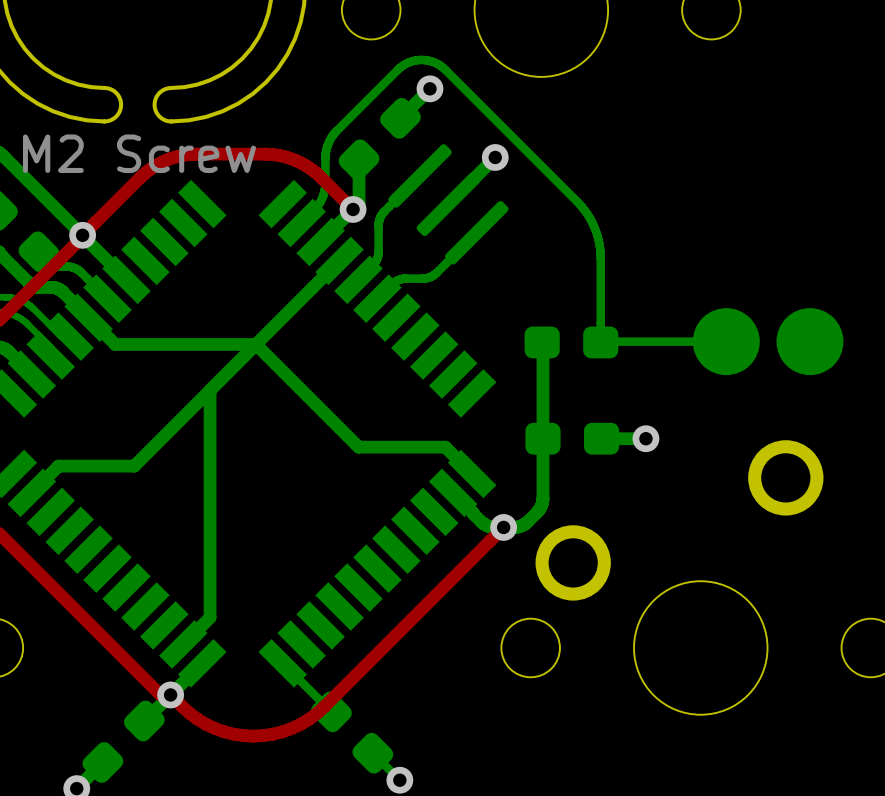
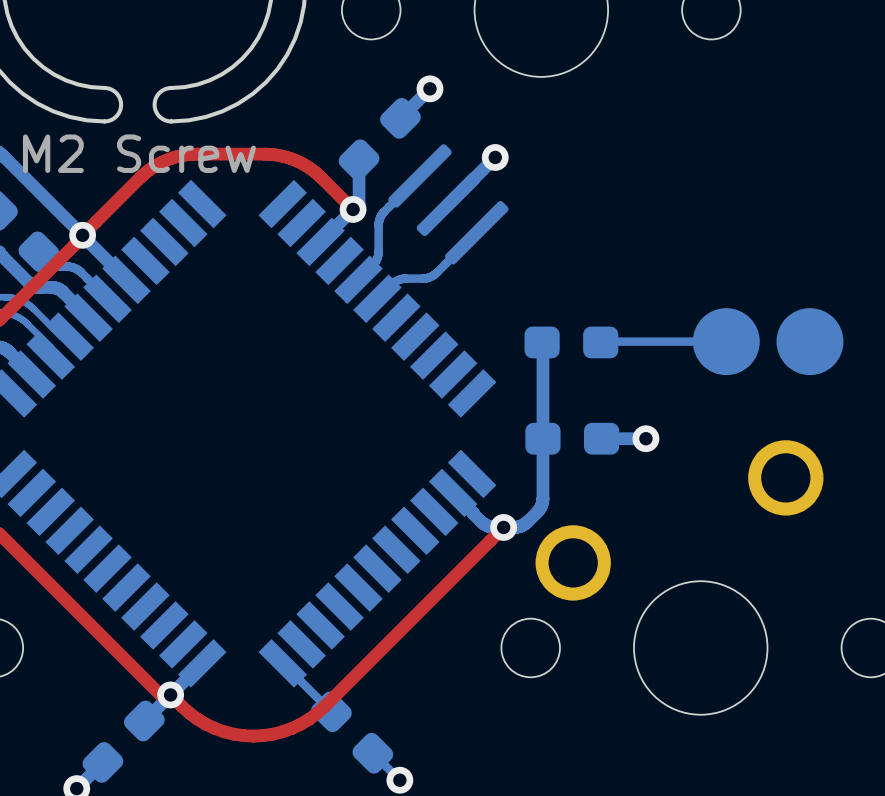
bottom track: (334, 133) (326, 150) (325, 184) (323, 196) (316, 208) (301, 222) -> none
bottom track: (334, 133) (403, 65) (411, 61) (424, 60) (442, 67) (577, 201) (589, 217) (596, 231) (600, 250) (600, 342) -> none
bottom track: (339, 260) (134, 466) (58, 466) (31, 492) -> none
bottom track: (88, 317) (115, 344) (255, 344) (358, 447) (445, 447) (472, 473) -> none
bottom track: (210, 390) (210, 617) (183, 644) -> none

